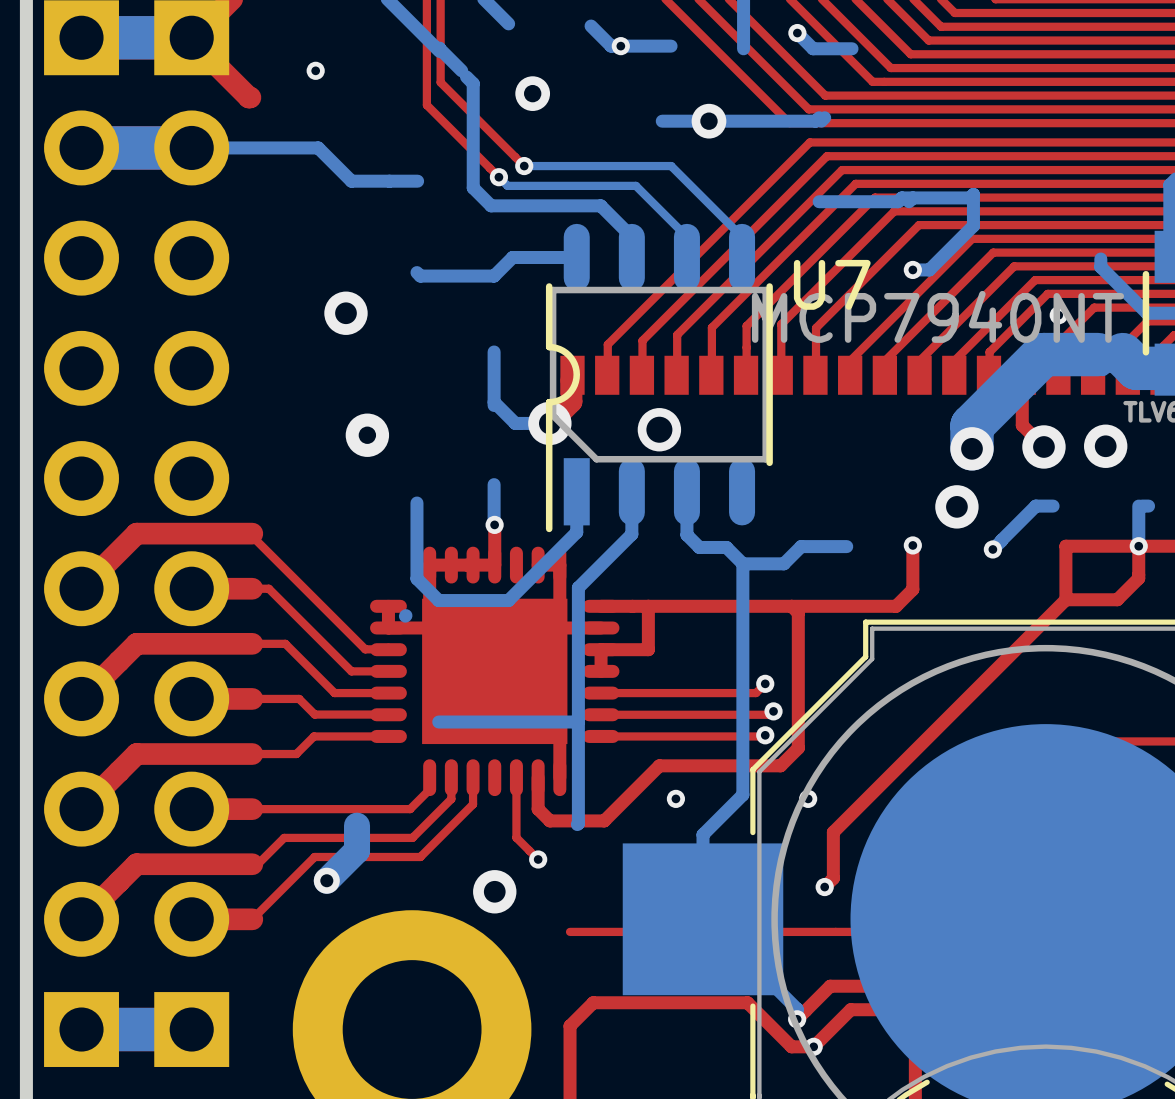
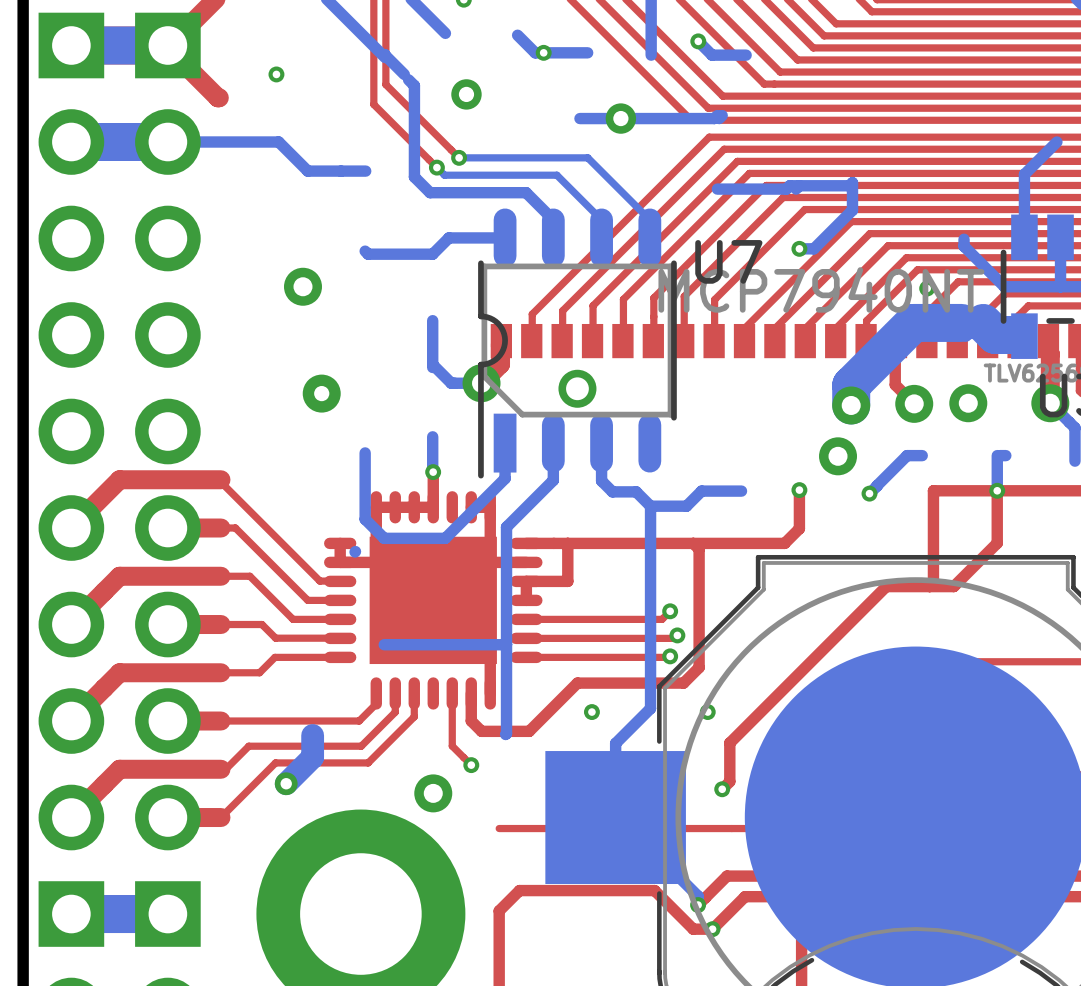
top track: (1138, 578) (1117, 599) (1065, 599) (833, 834) -> (997, 518) (997, 543) (953, 586) (886, 586) (729, 743)
top track: none -> (933, 537) (933, 582) (929, 586)

